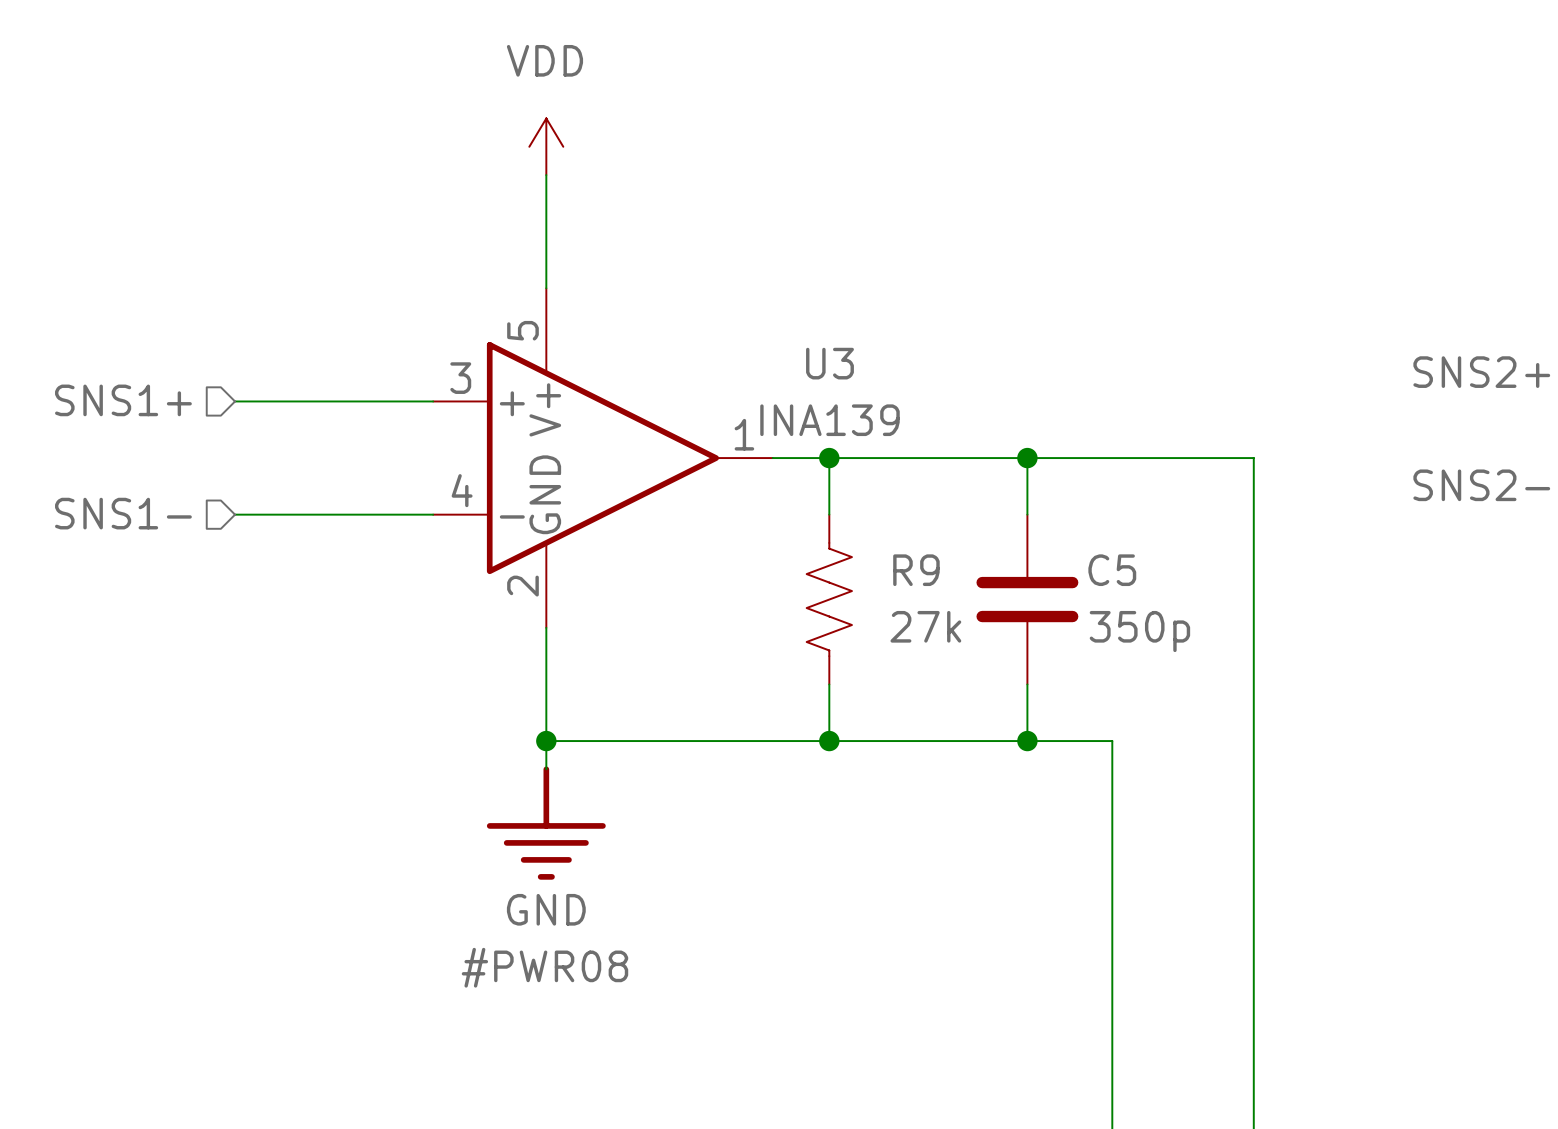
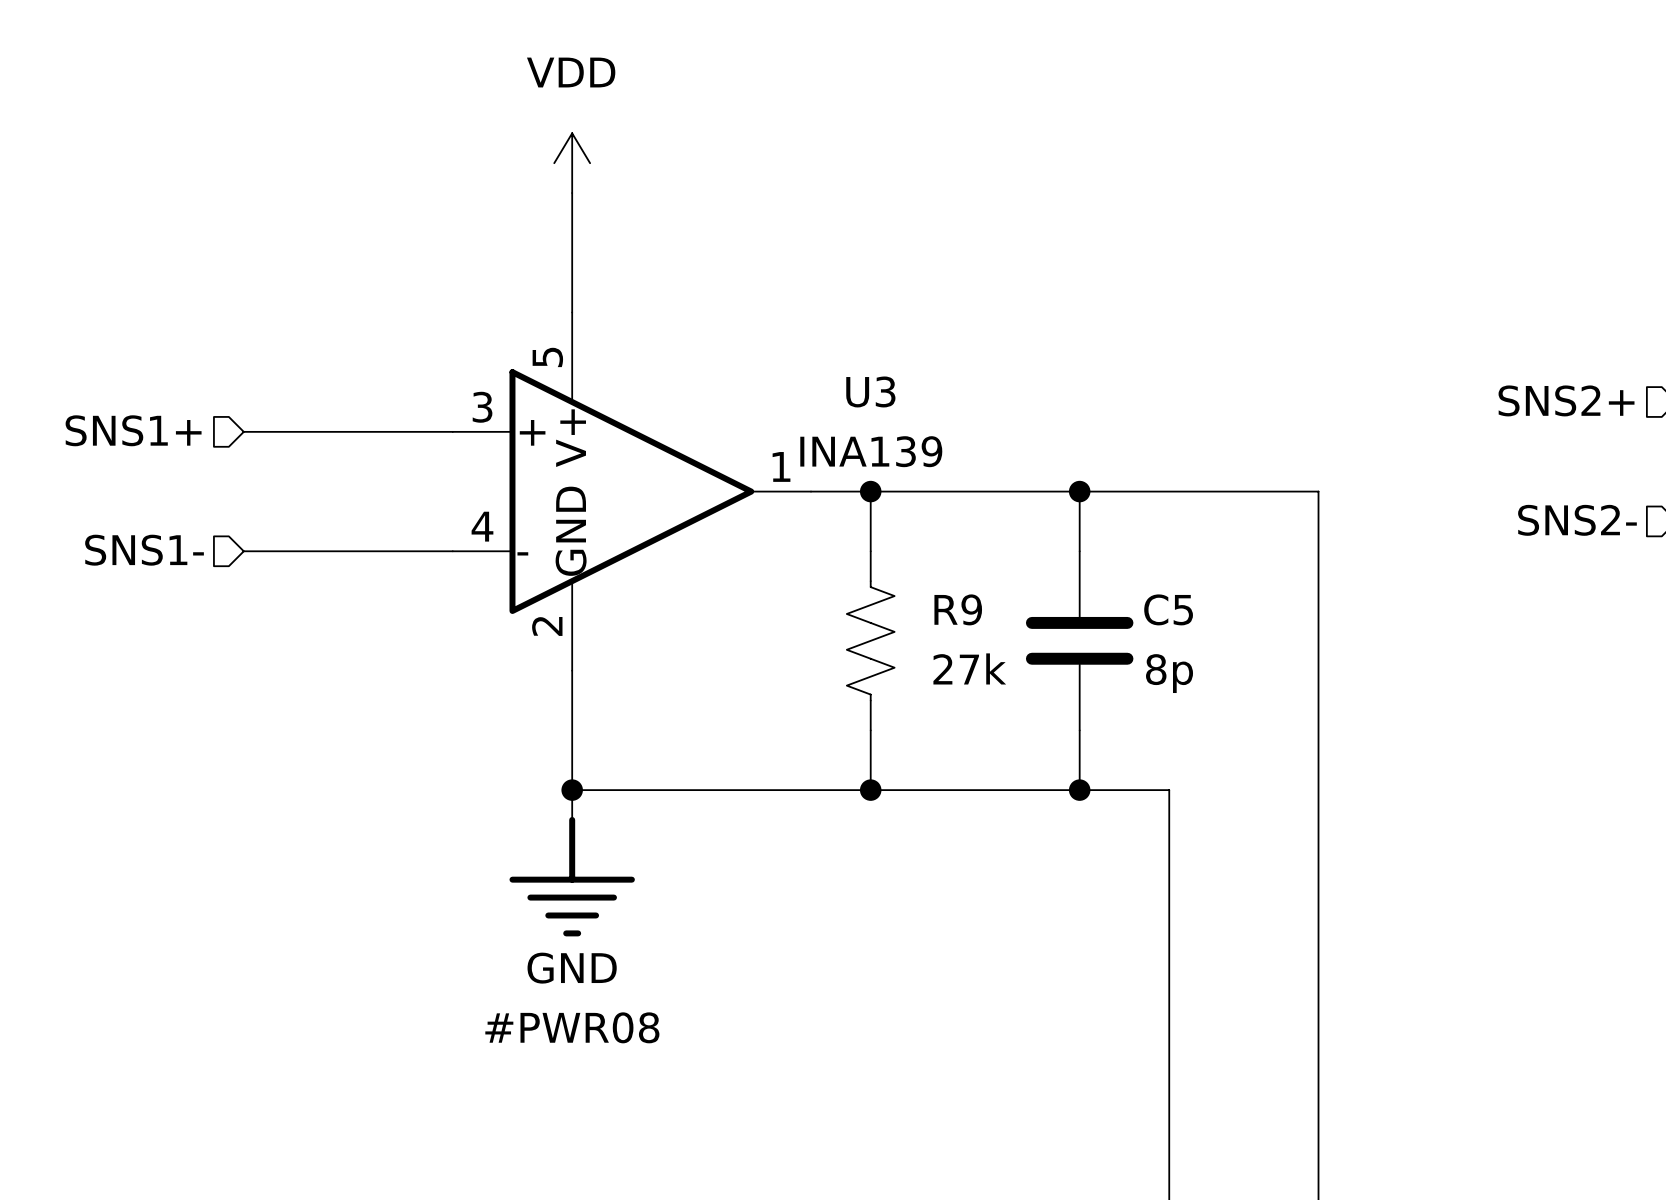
C5 value: 350p (1139, 631) -> 8p (1169, 673)

